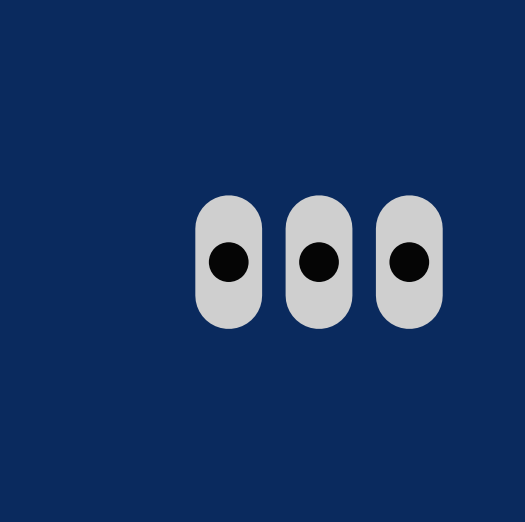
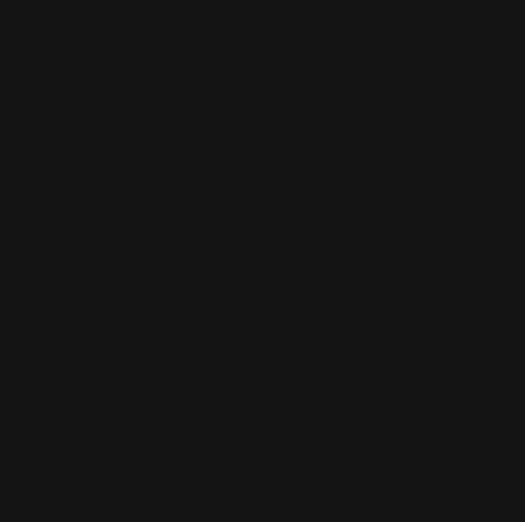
part: (319, 262) -> none

